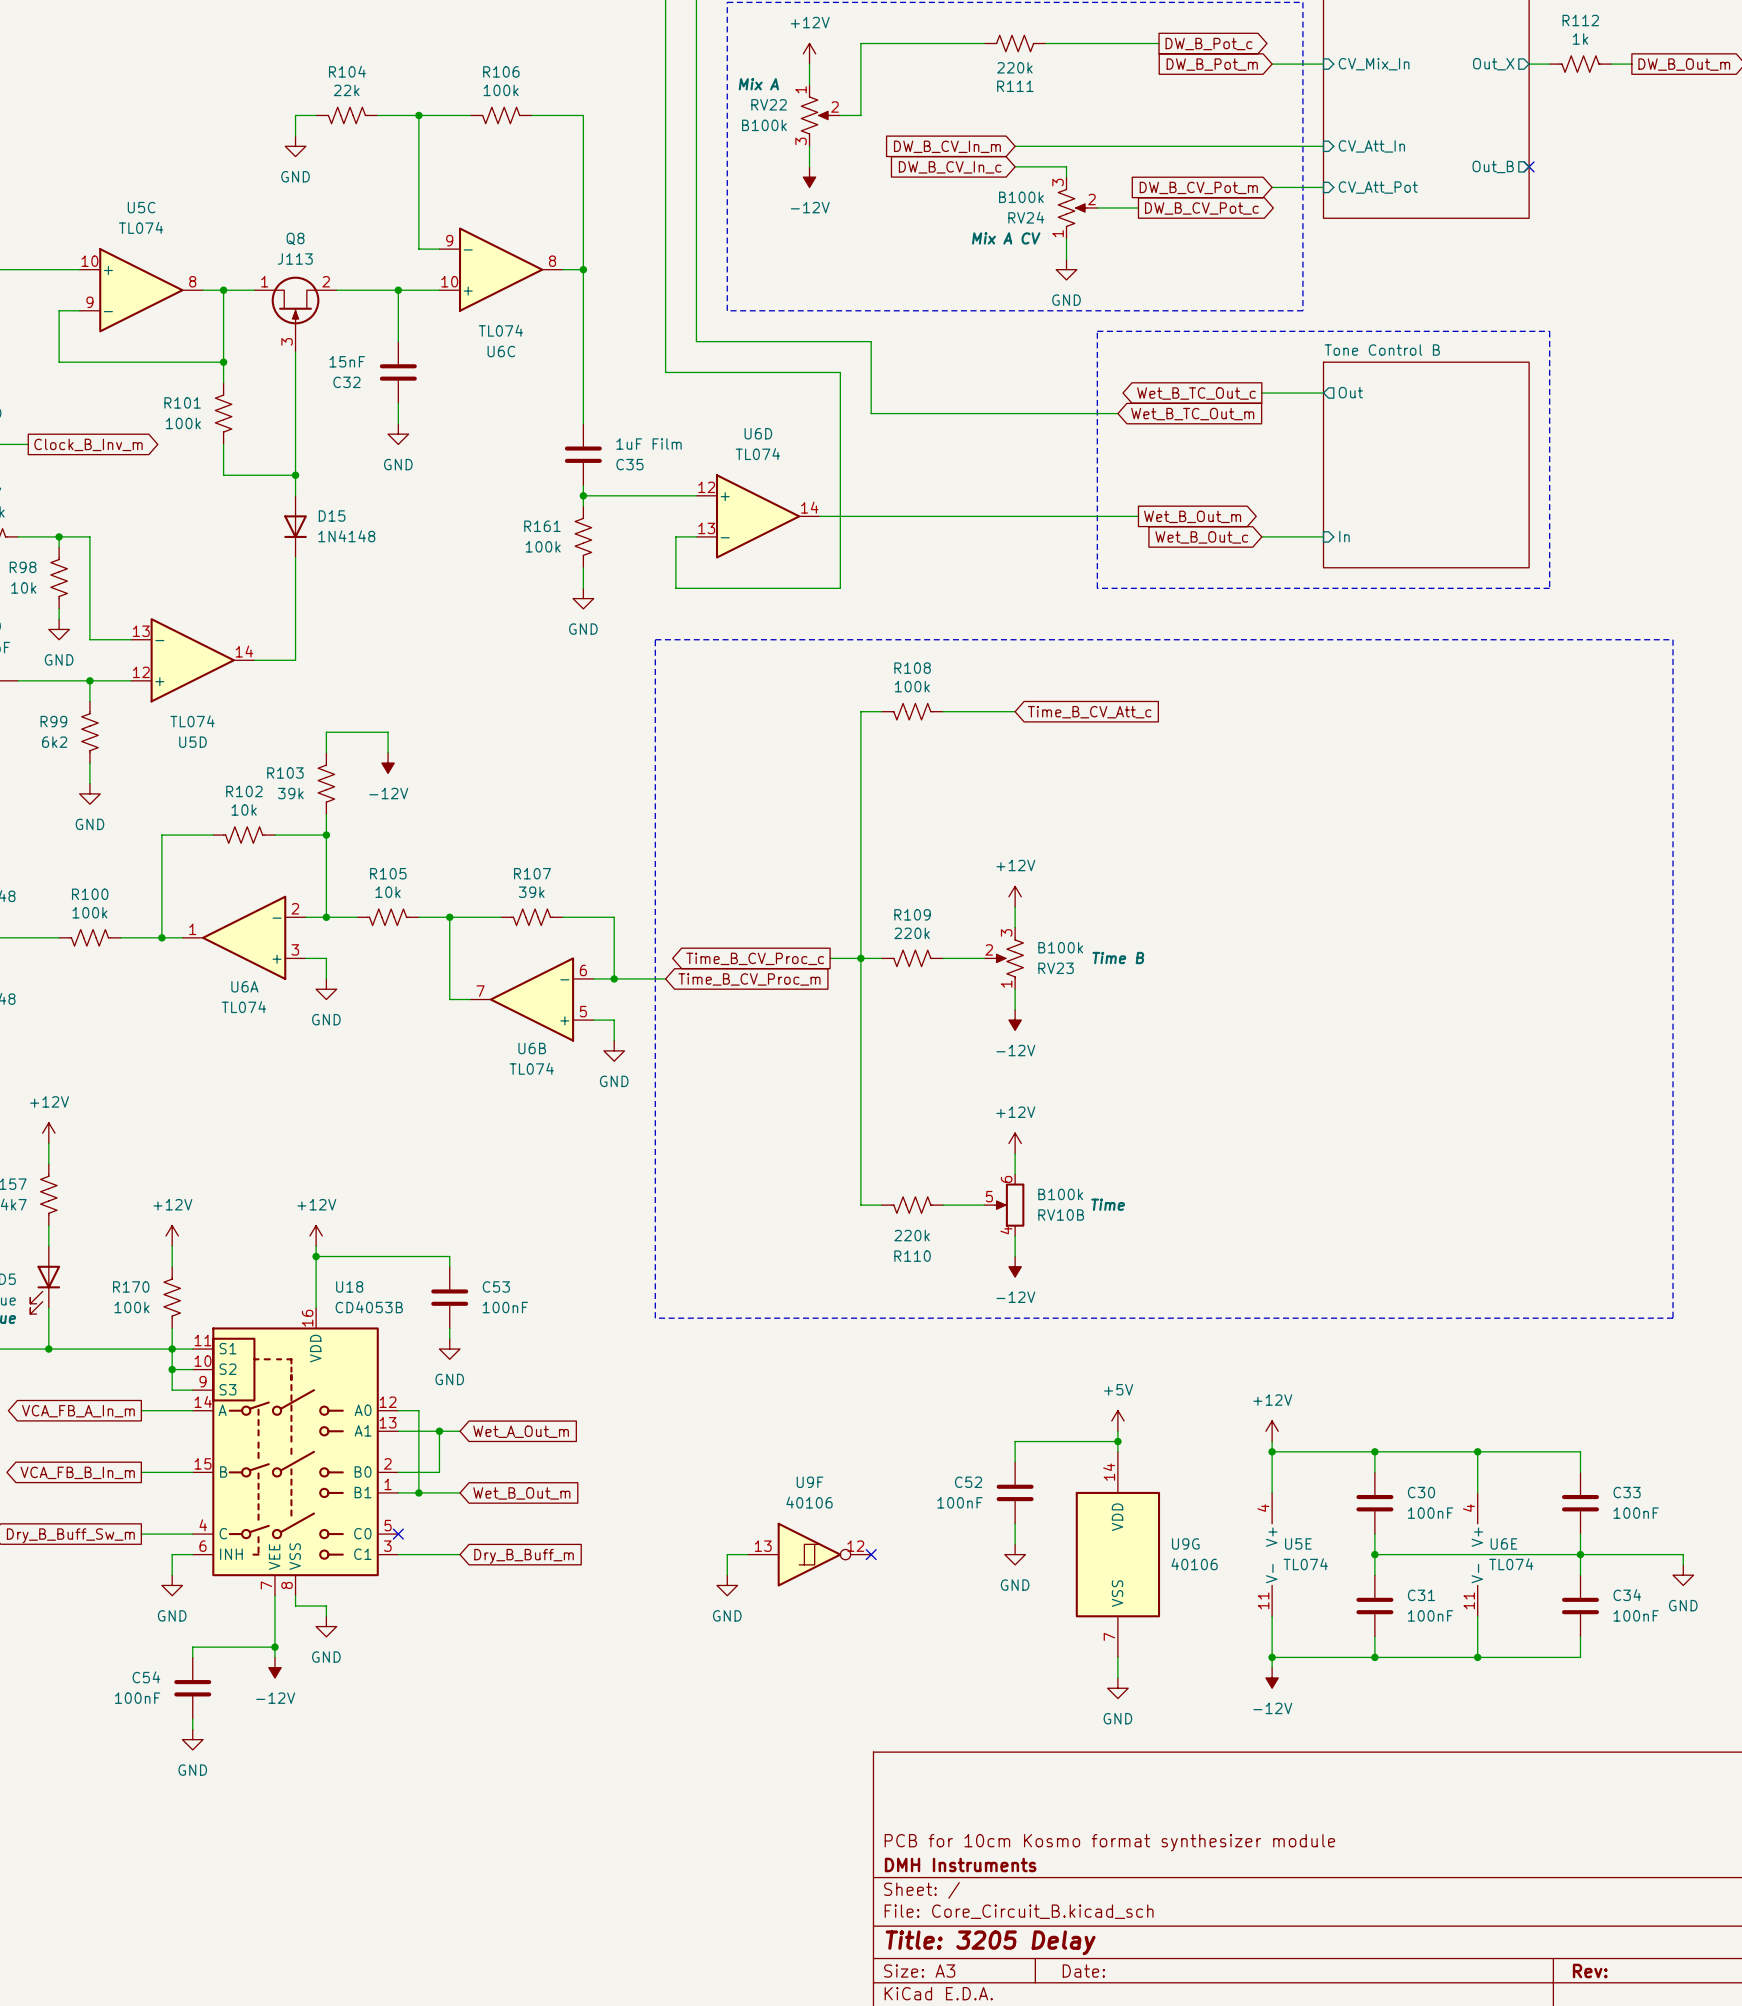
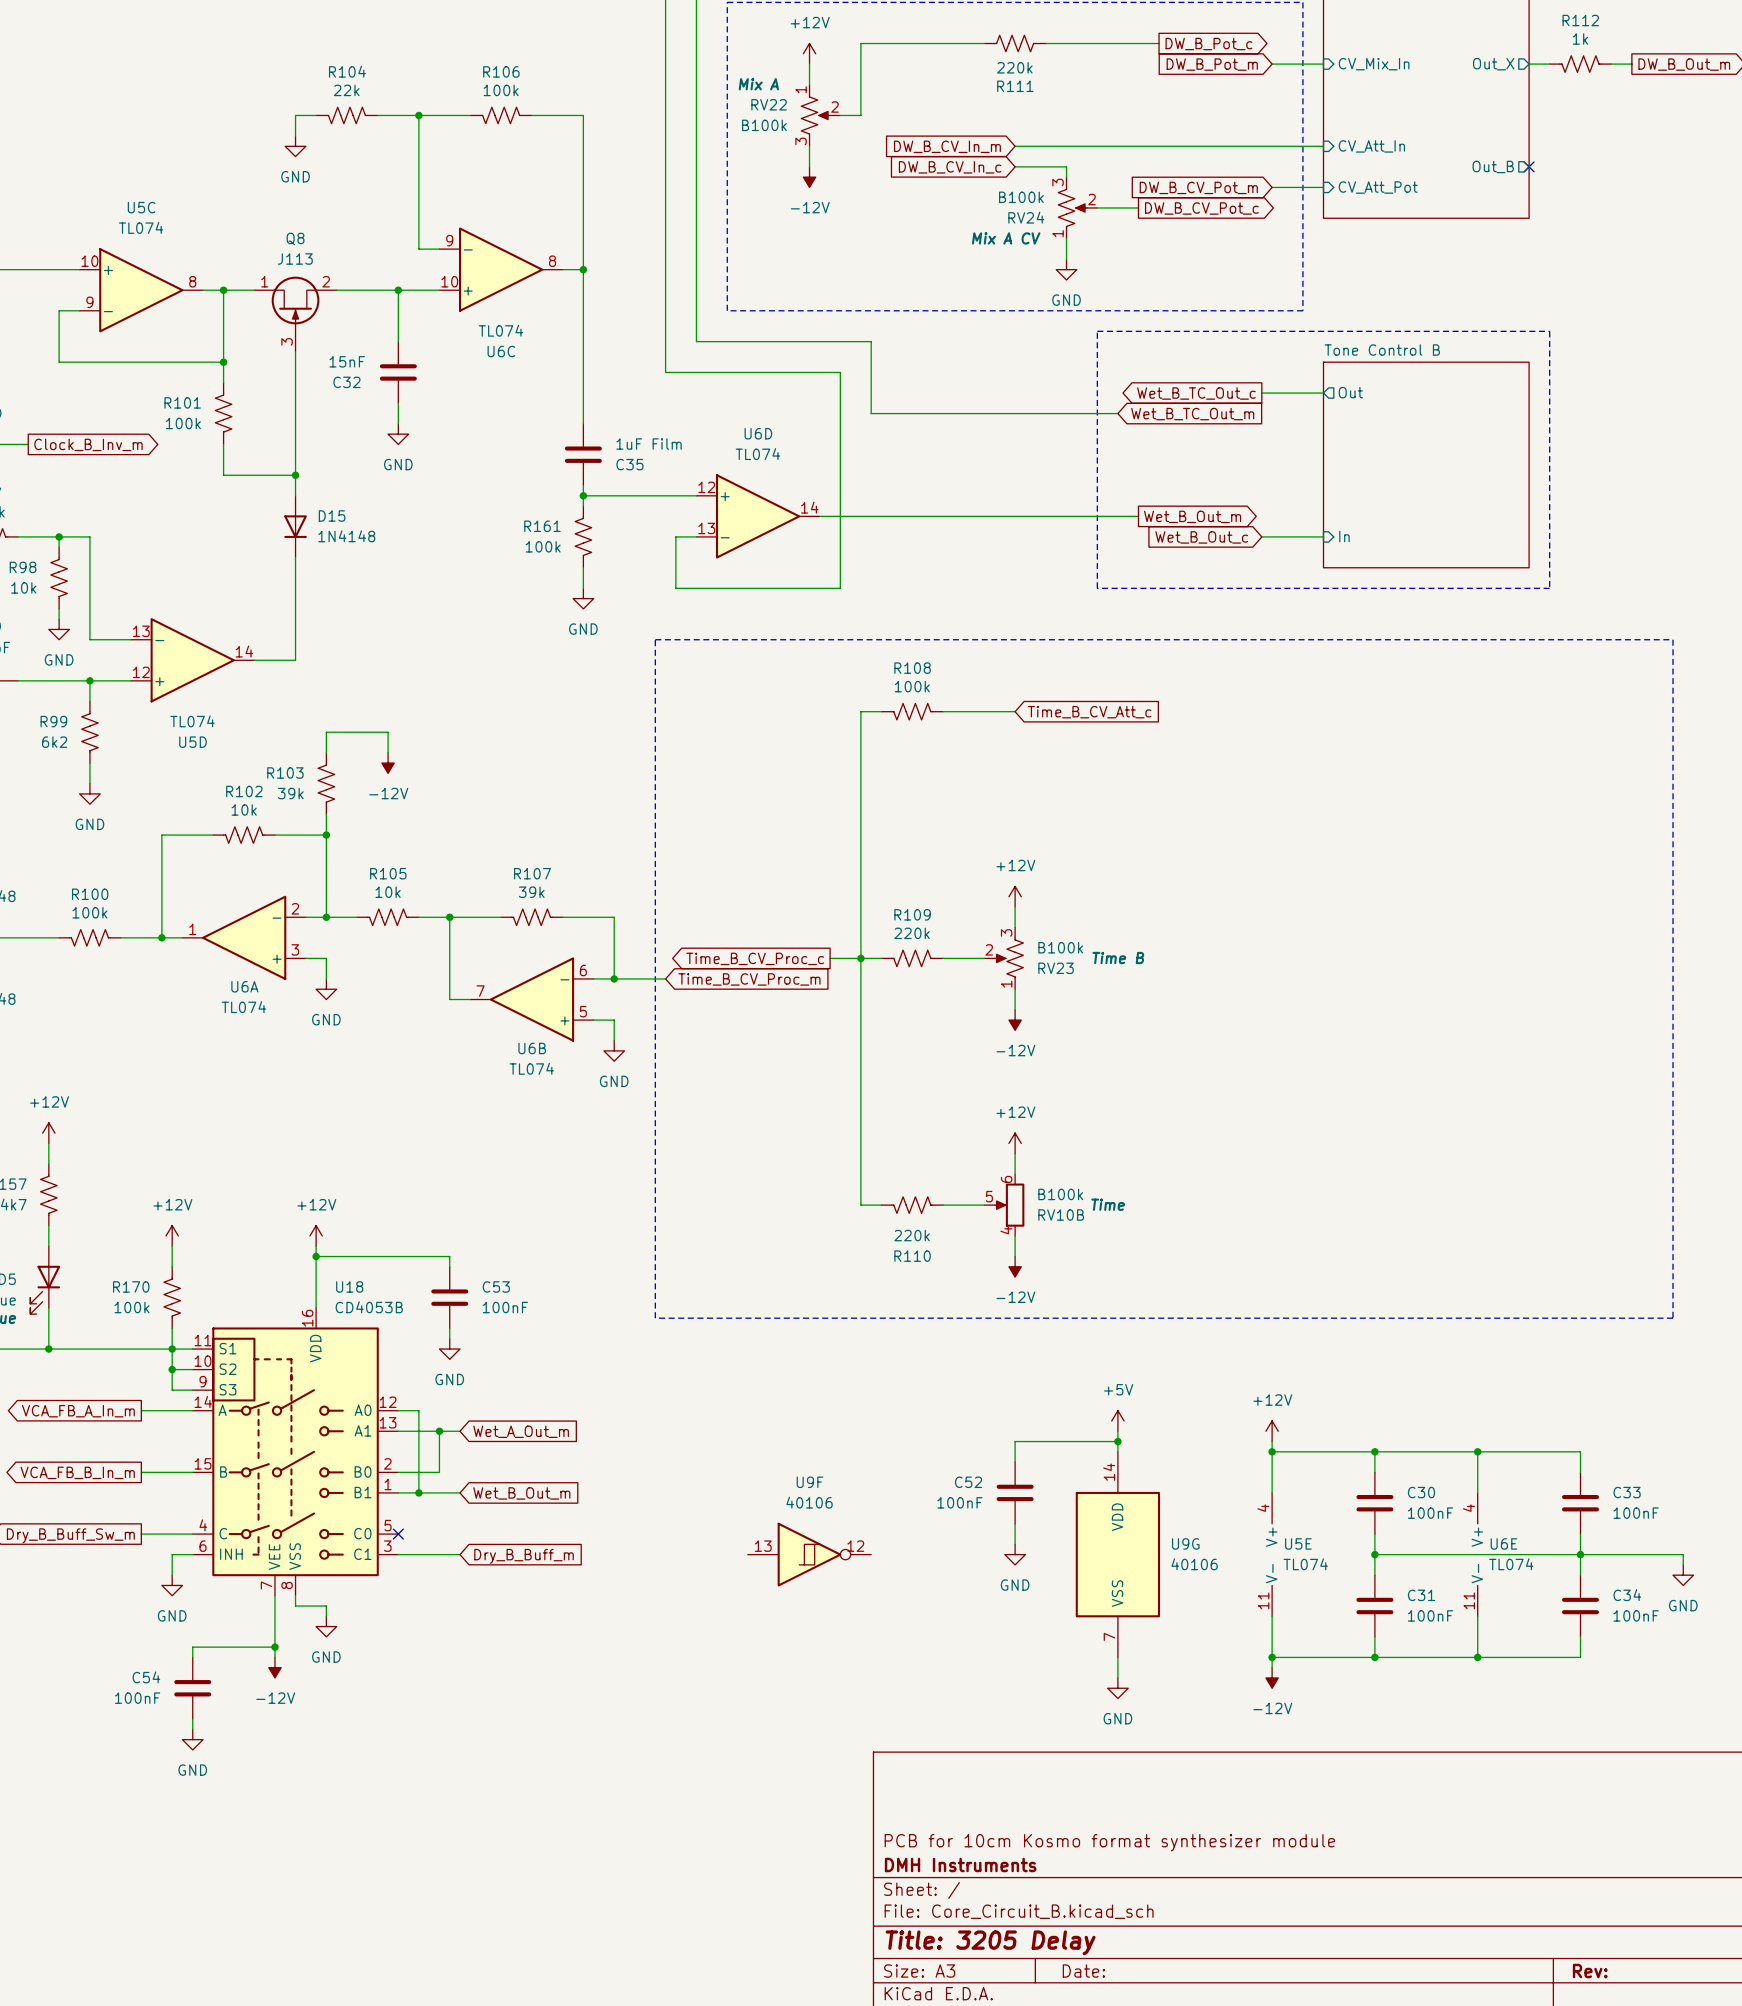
wire: (747, 1554) (727, 1554) (727, 1575) -> none
no-connect mark: (871, 1554) -> none
power symbol: GND (727, 1585) -> none

